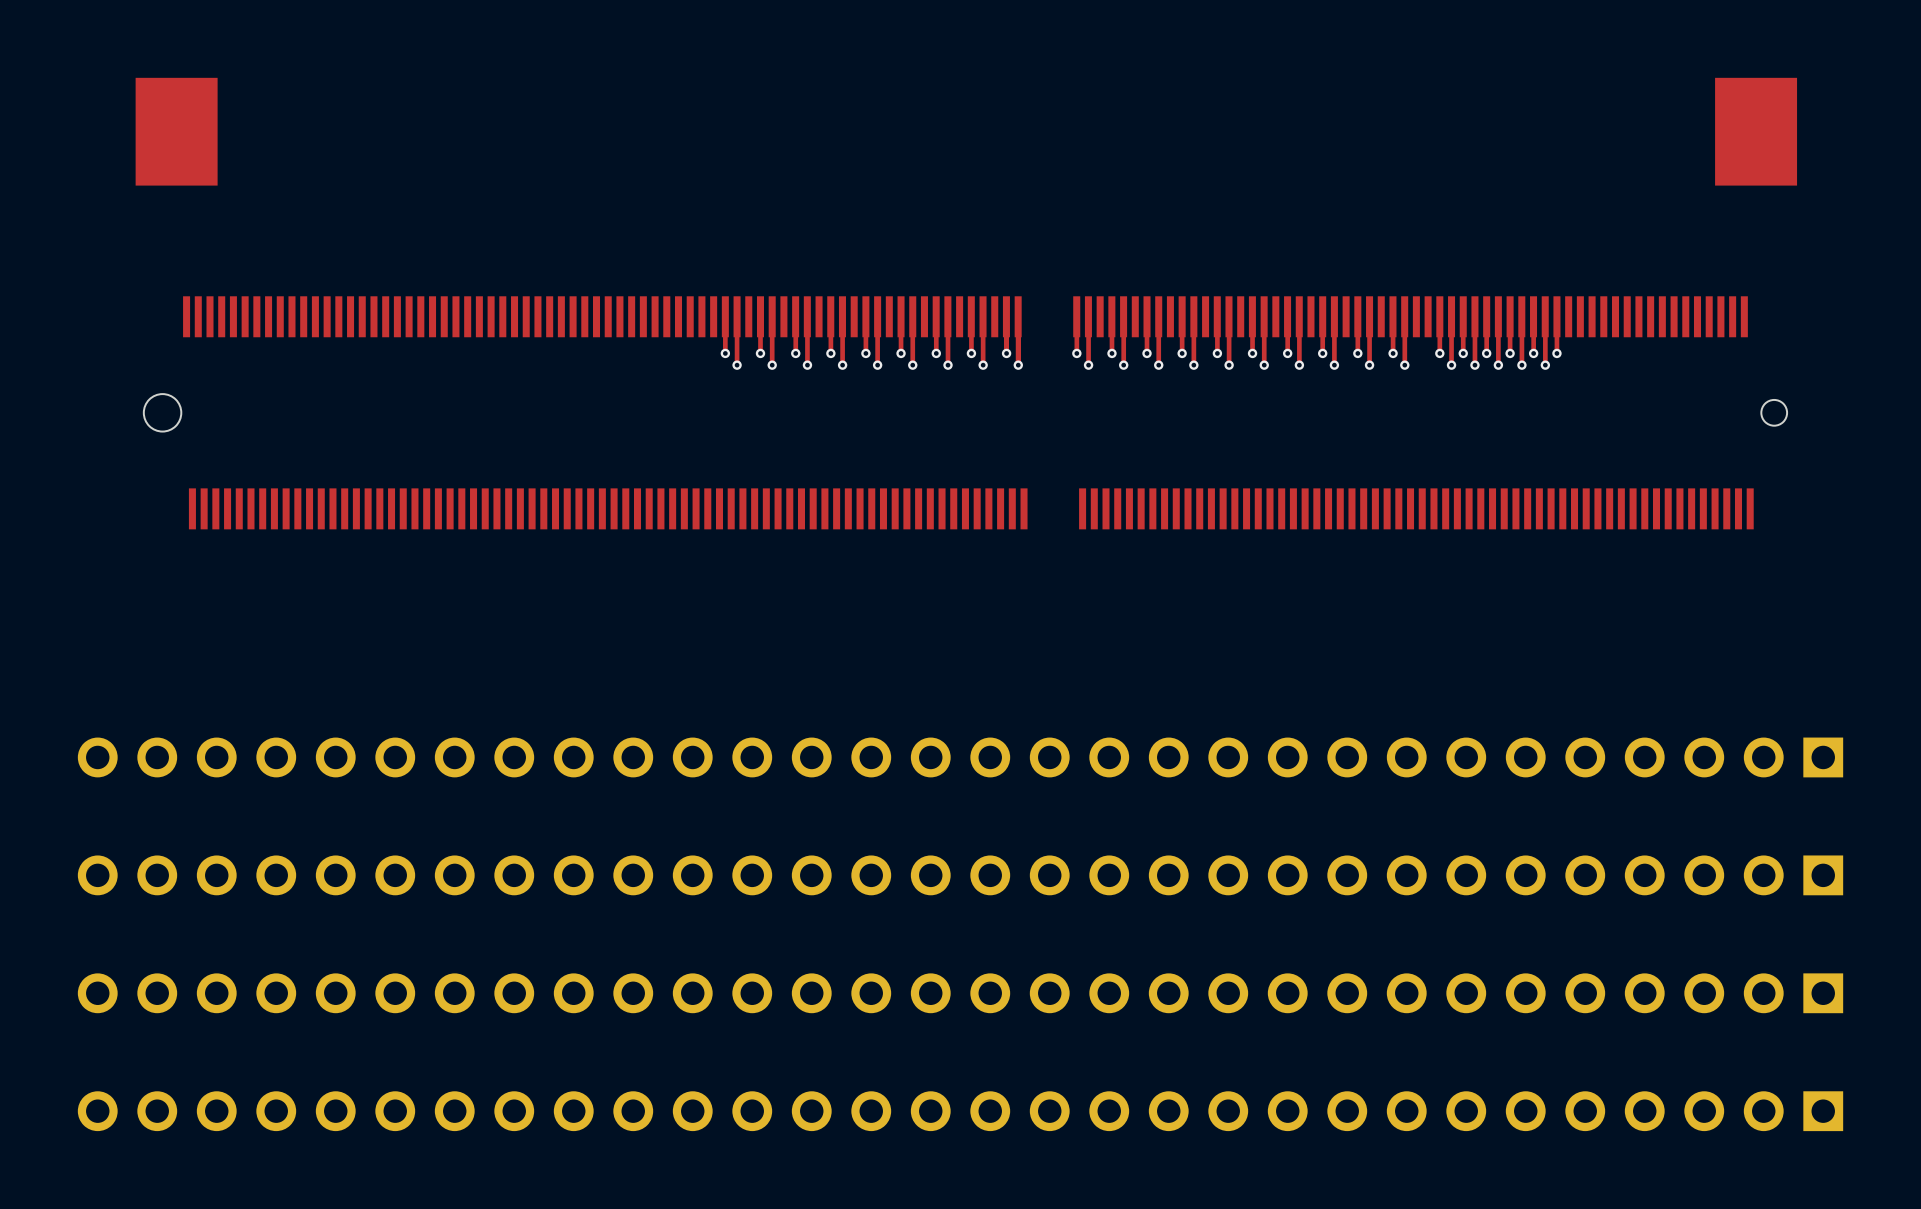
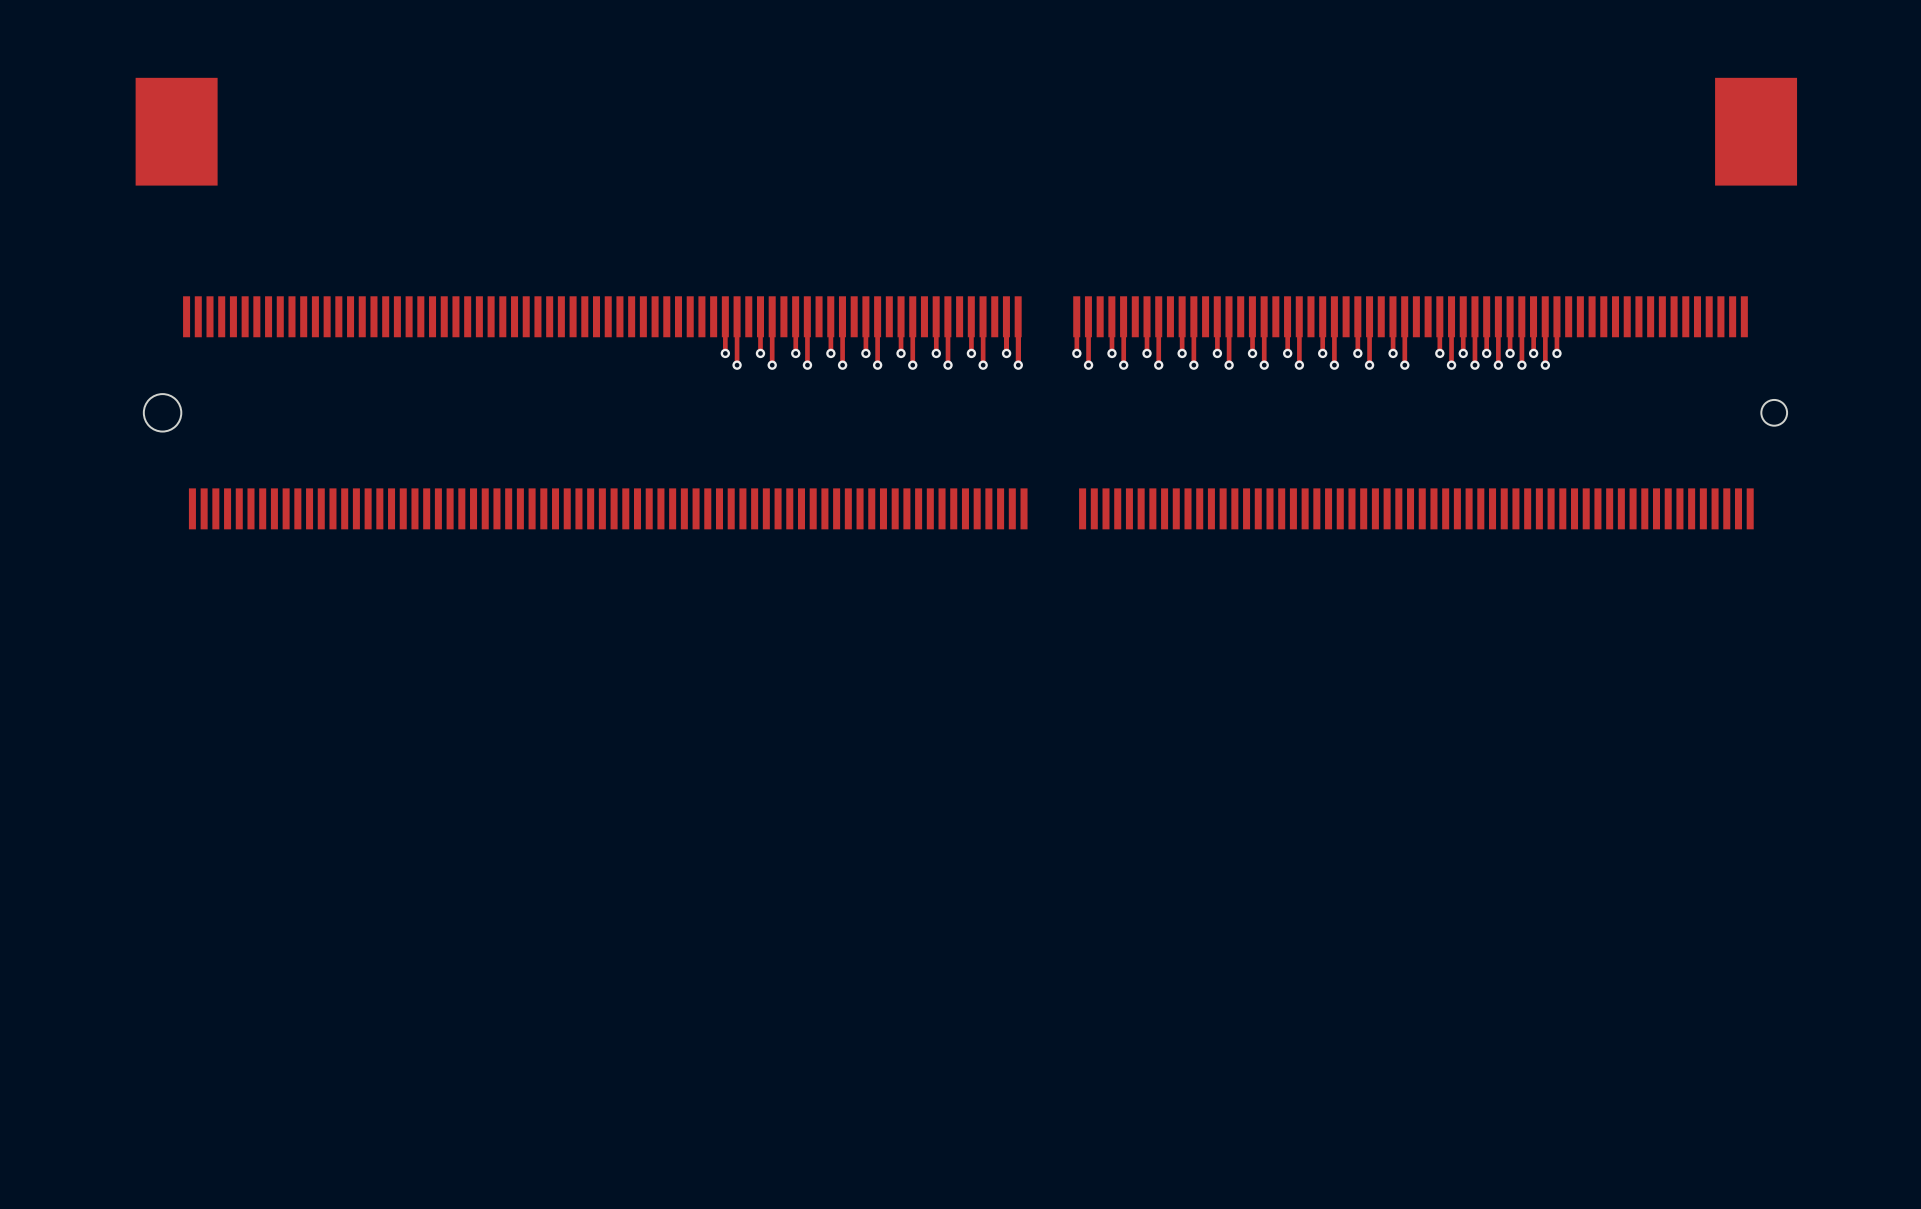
part: (960, 757) -> none
part: (960, 875) -> none
part: (960, 993) -> none
part: (960, 1111) -> none

